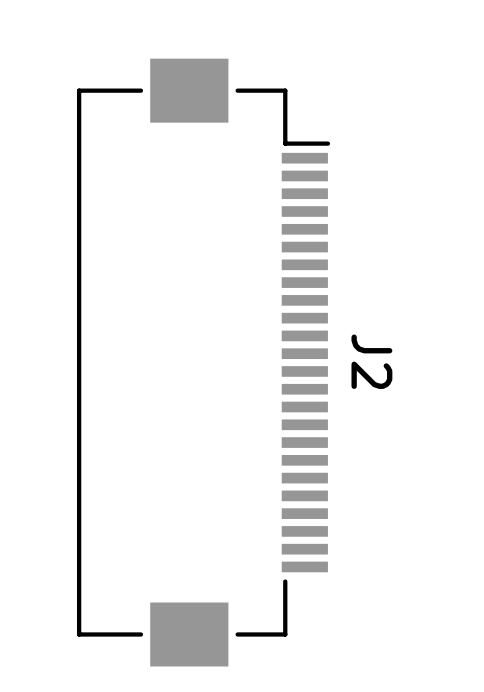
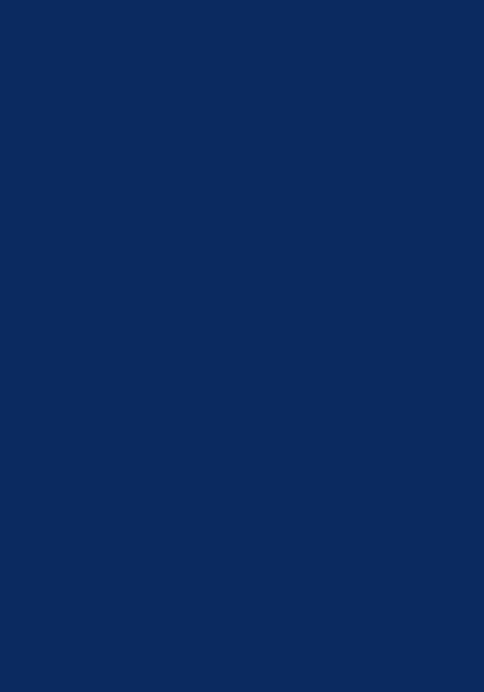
J2: (203, 362) -> none

